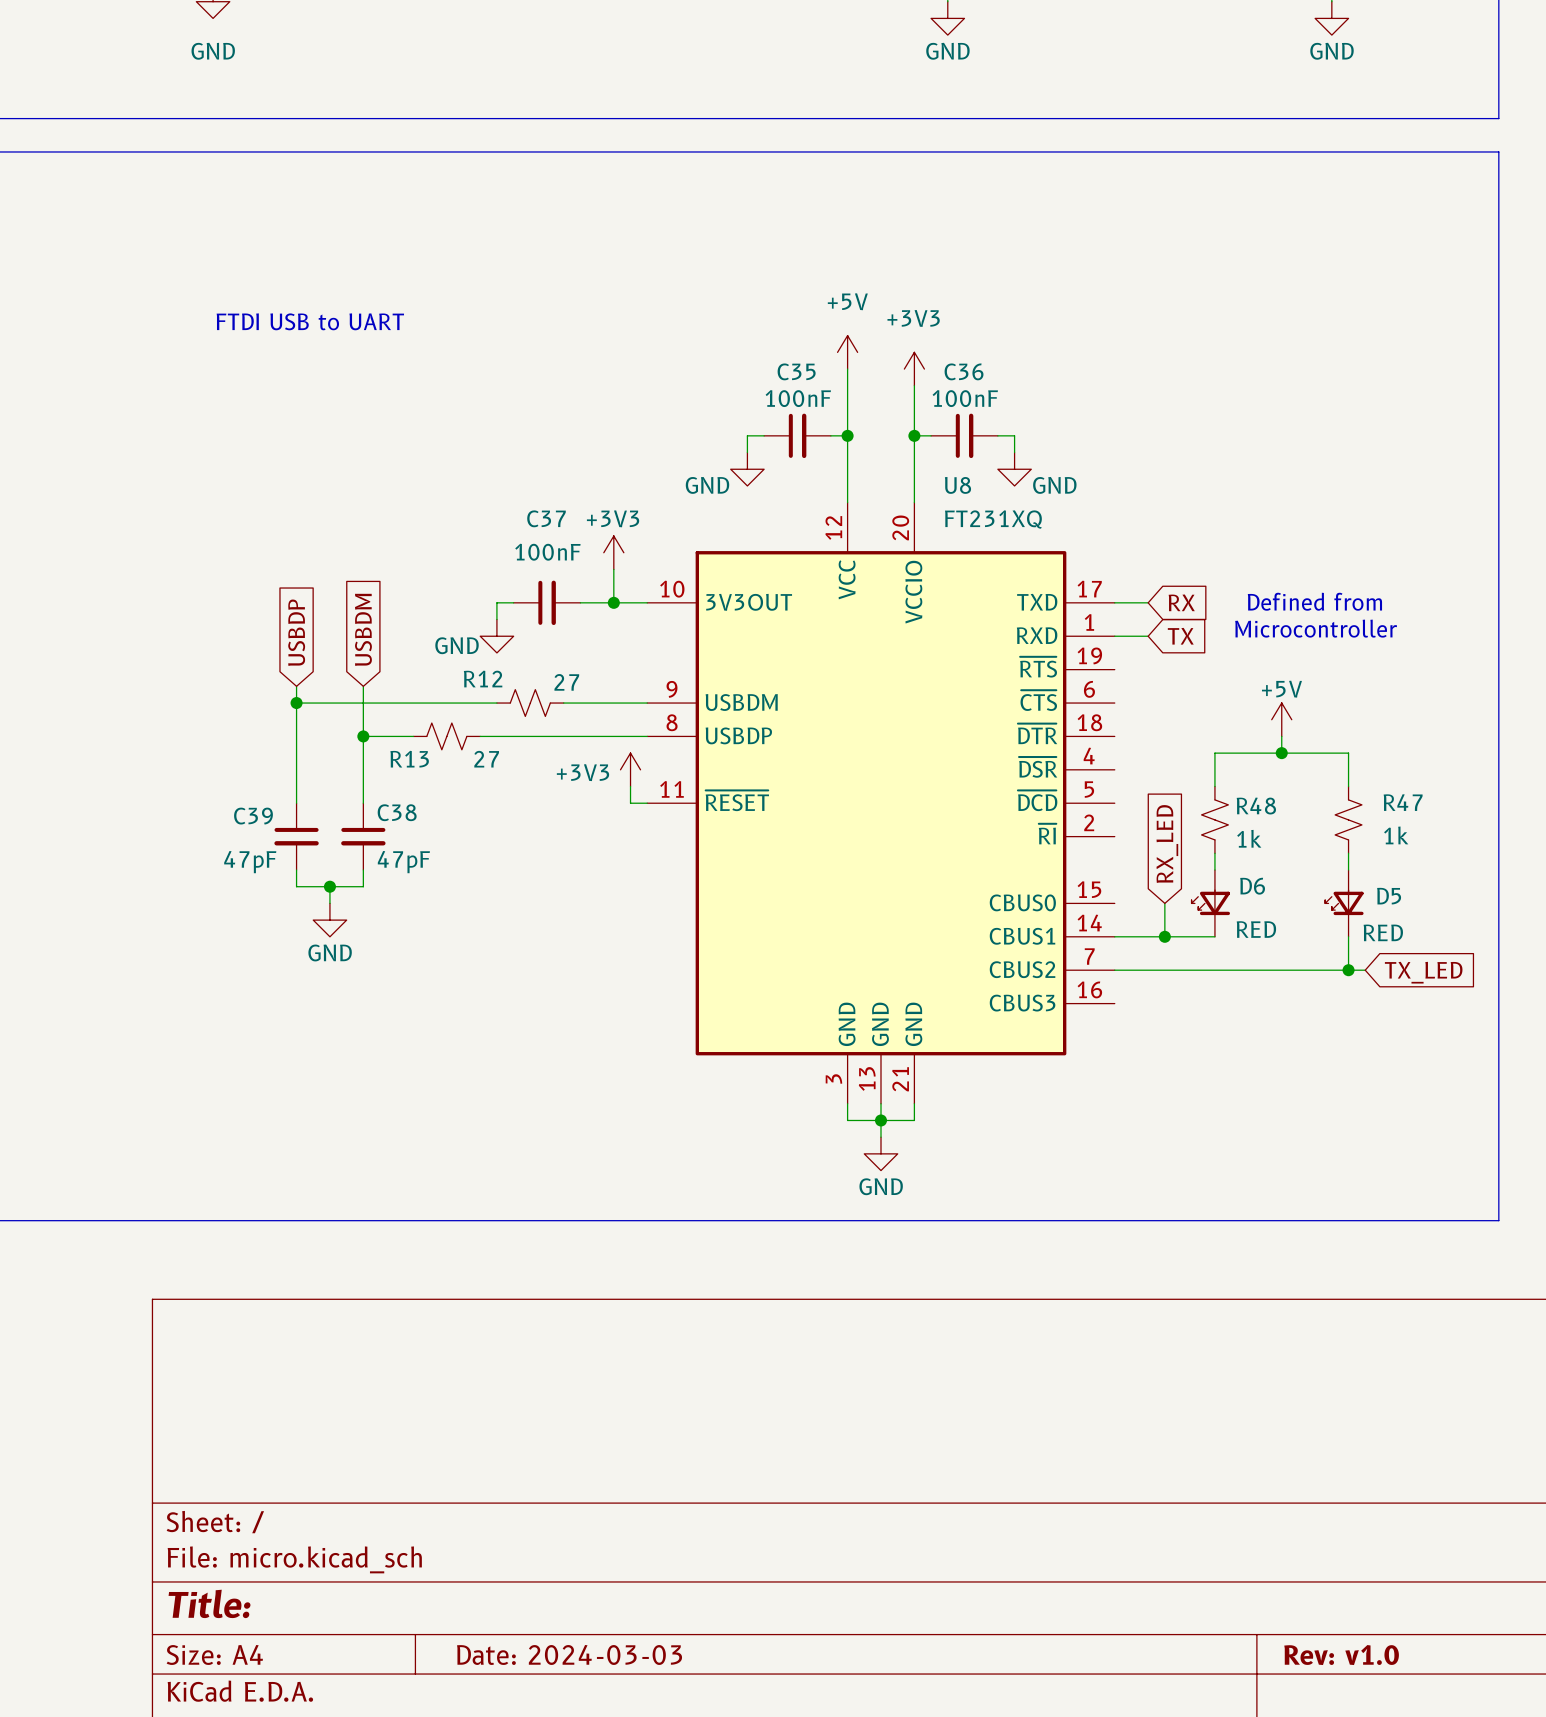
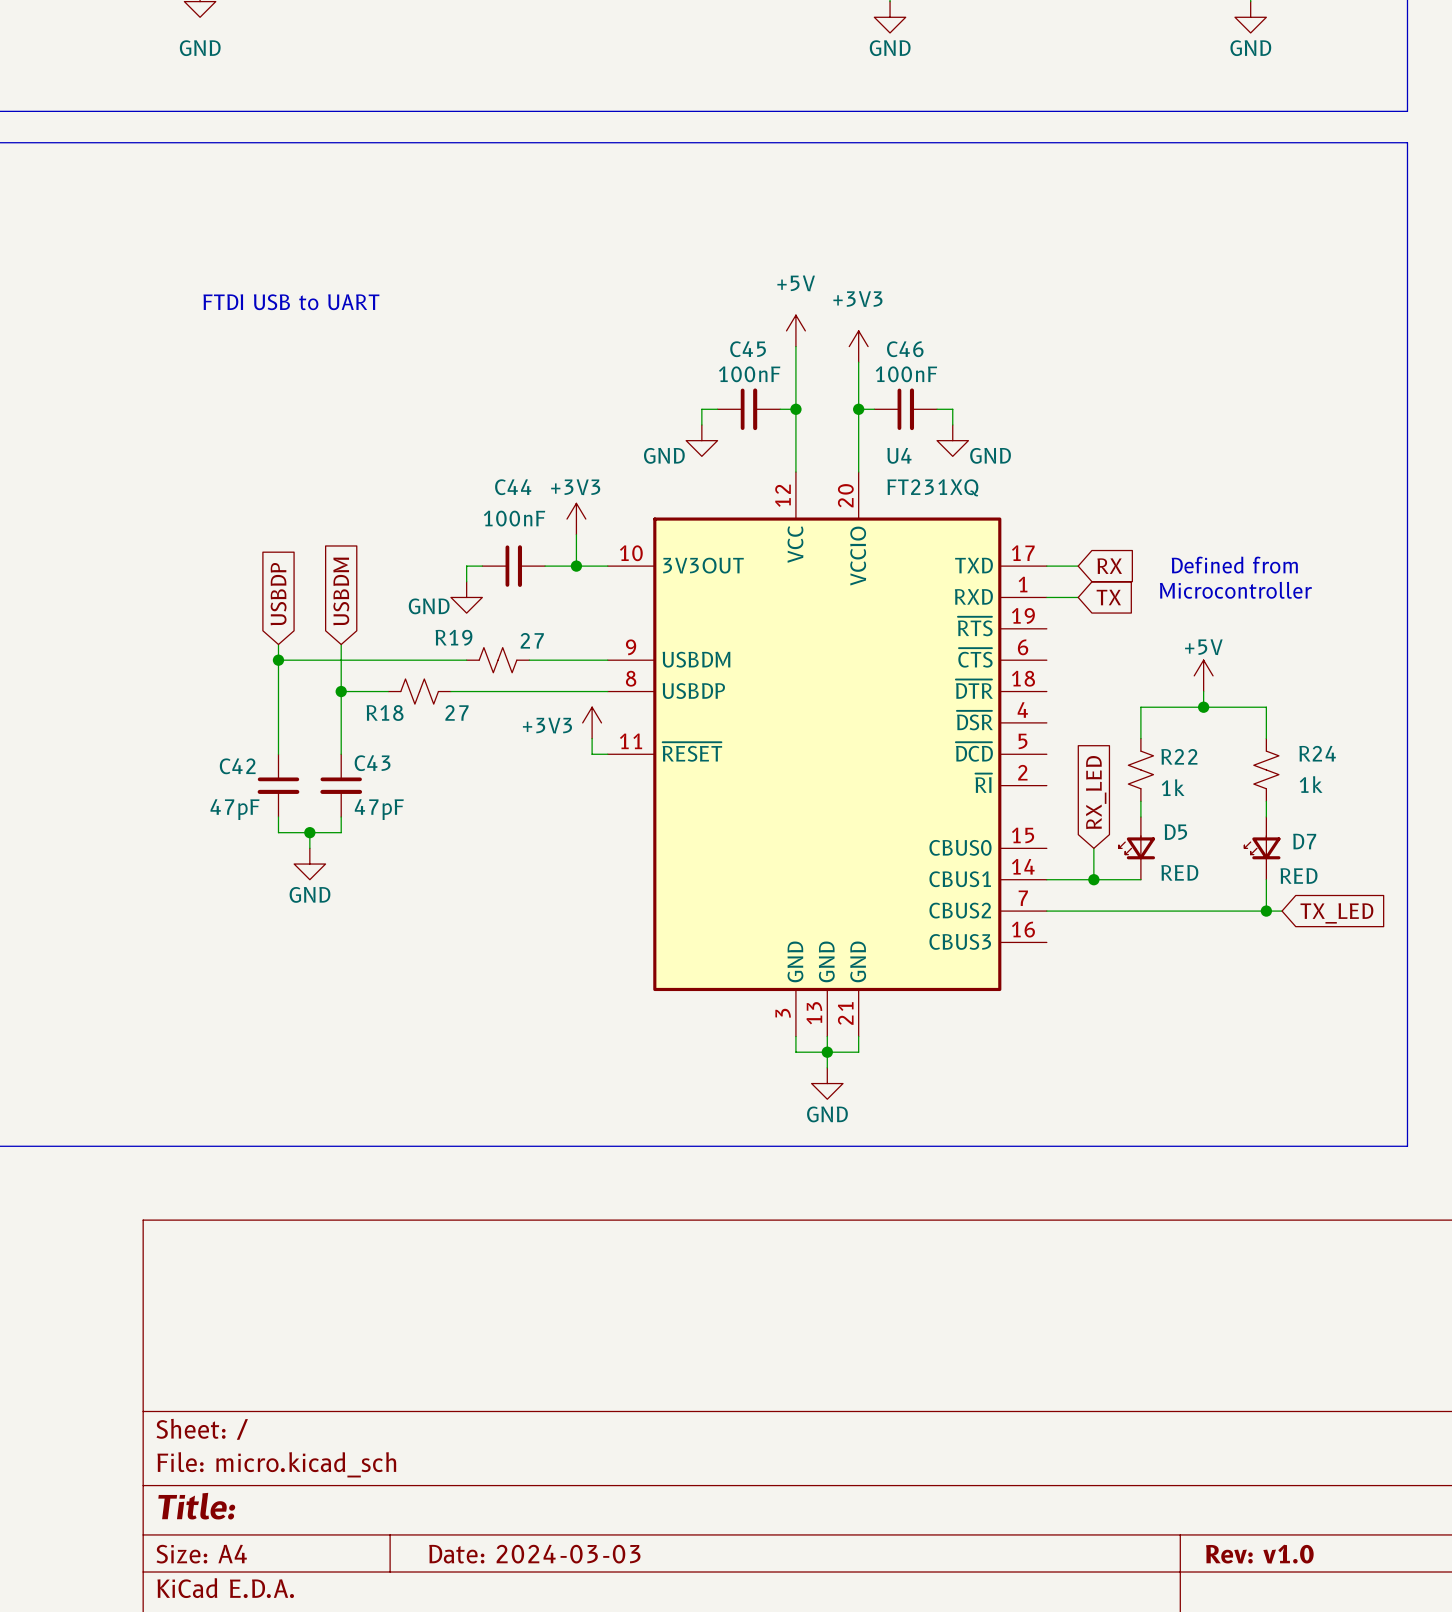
C35 name: C35 (796, 371) -> C45 (748, 349)
C36 name: C36 (964, 371) -> C46 (905, 349)
U8 name: U8 (957, 485) -> U4 (899, 455)
C37 name: C37 (546, 518) -> C44 (513, 487)
R12 name: R12 (483, 679) -> R19 (453, 637)
R13 name: R13 (409, 759) -> R18 (385, 713)
R47 name: R47 (1403, 802) -> R24 (1317, 753)
R48 name: R48 (1256, 806) -> R22 (1179, 756)
C38 name: C38 (397, 812) -> C43 (372, 763)
C39 name: C39 (253, 816) -> C42 (237, 766)
D6 name: D6 (1252, 886) -> D5 (1175, 832)
D5 name: D5 (1389, 896) -> D7 (1304, 841)

